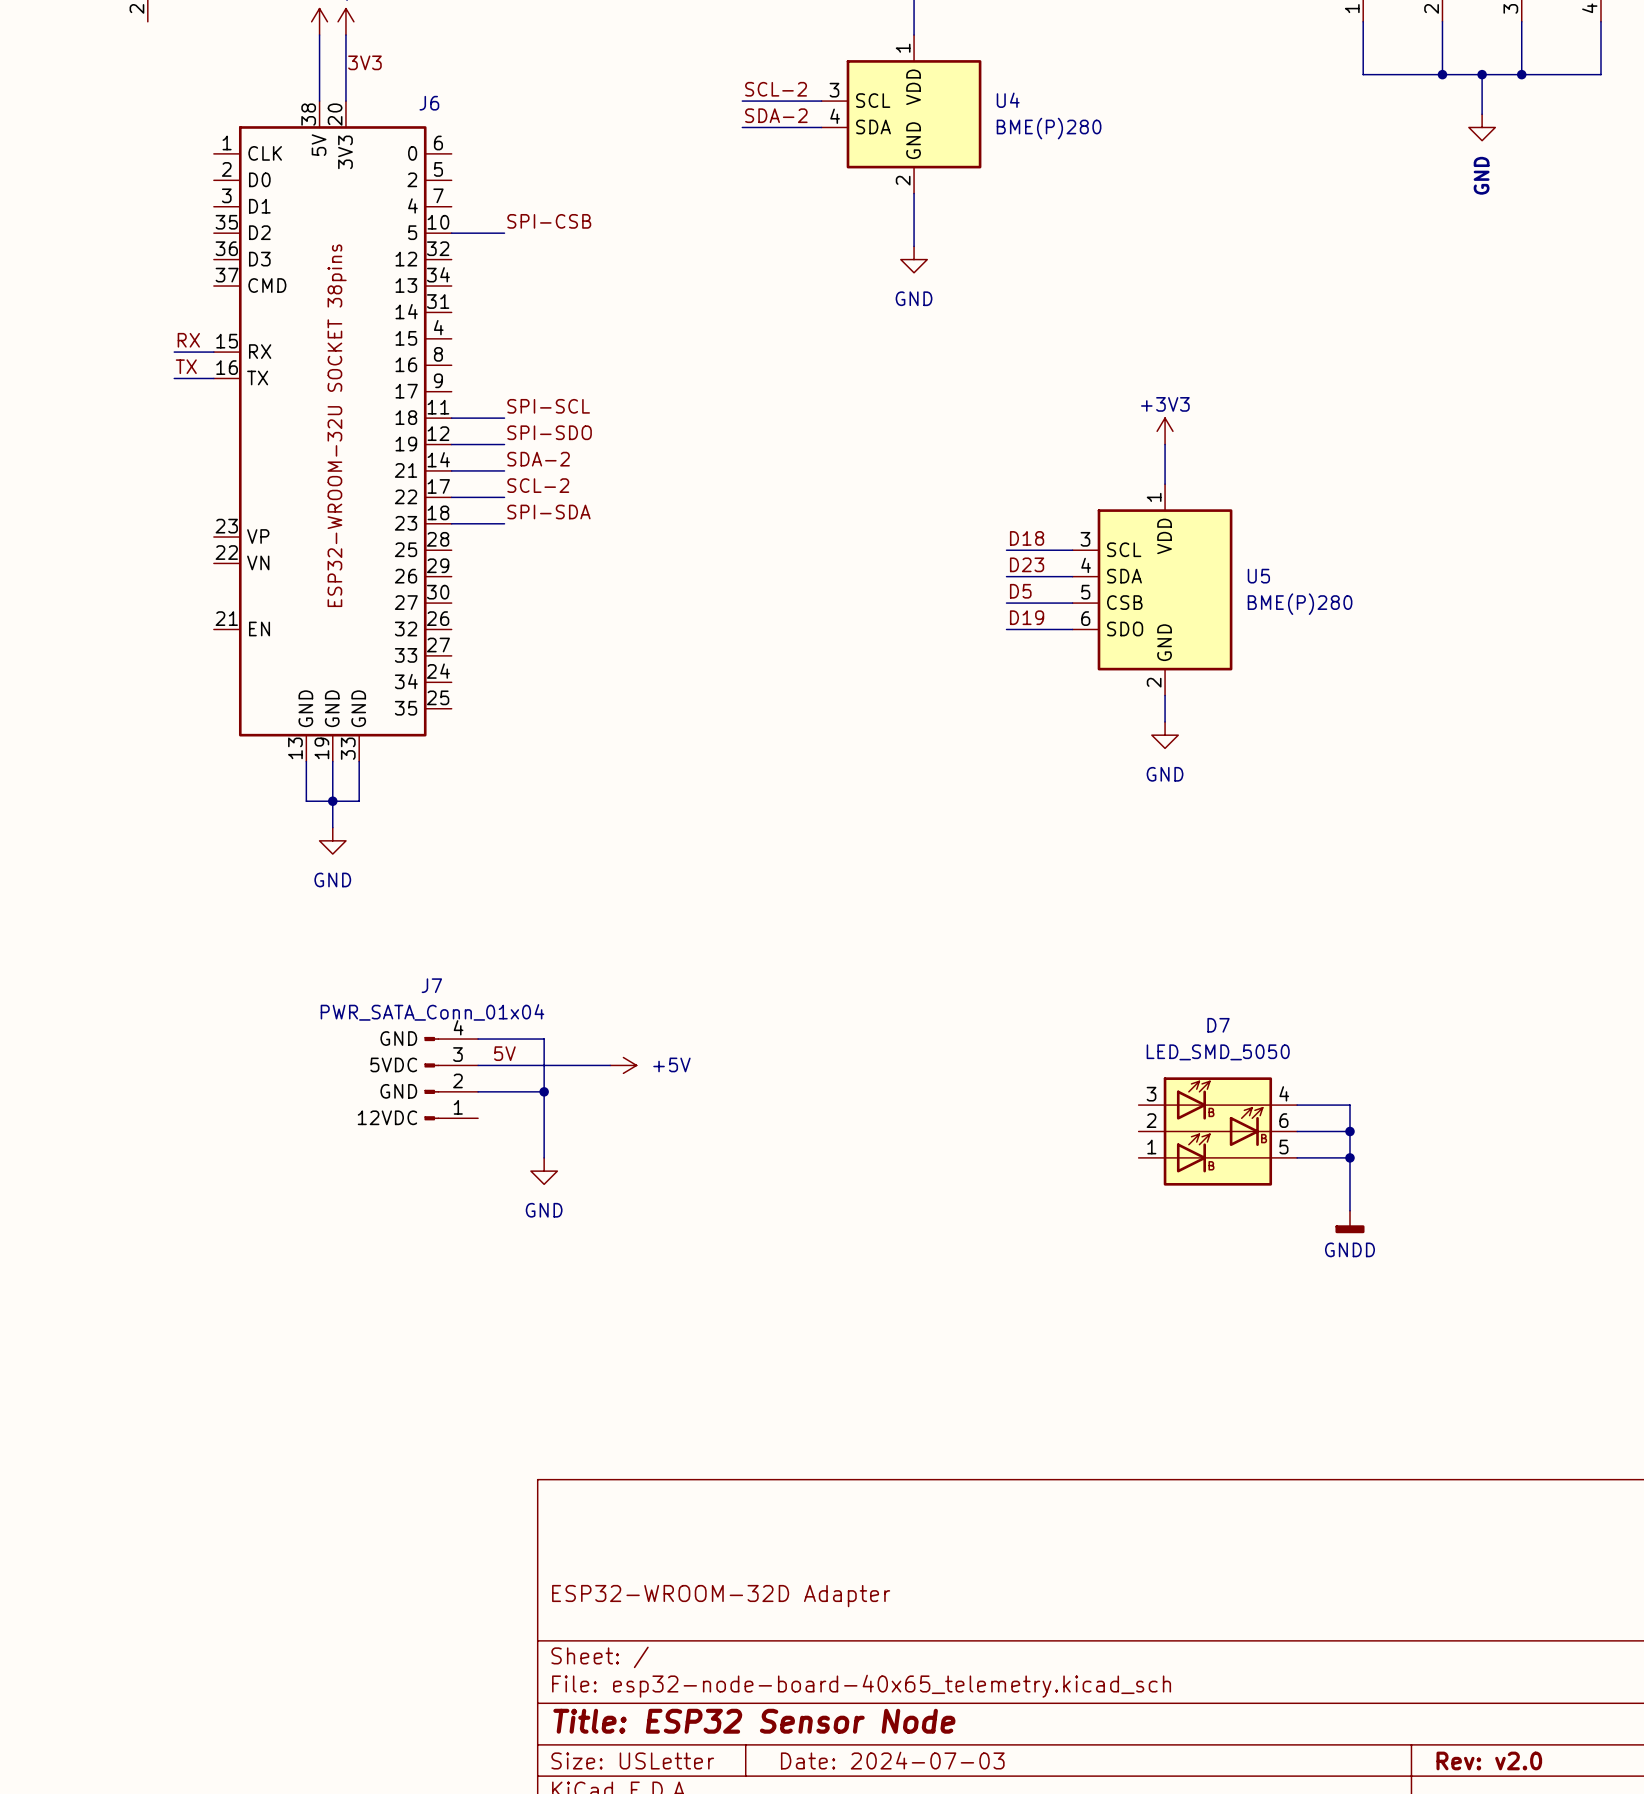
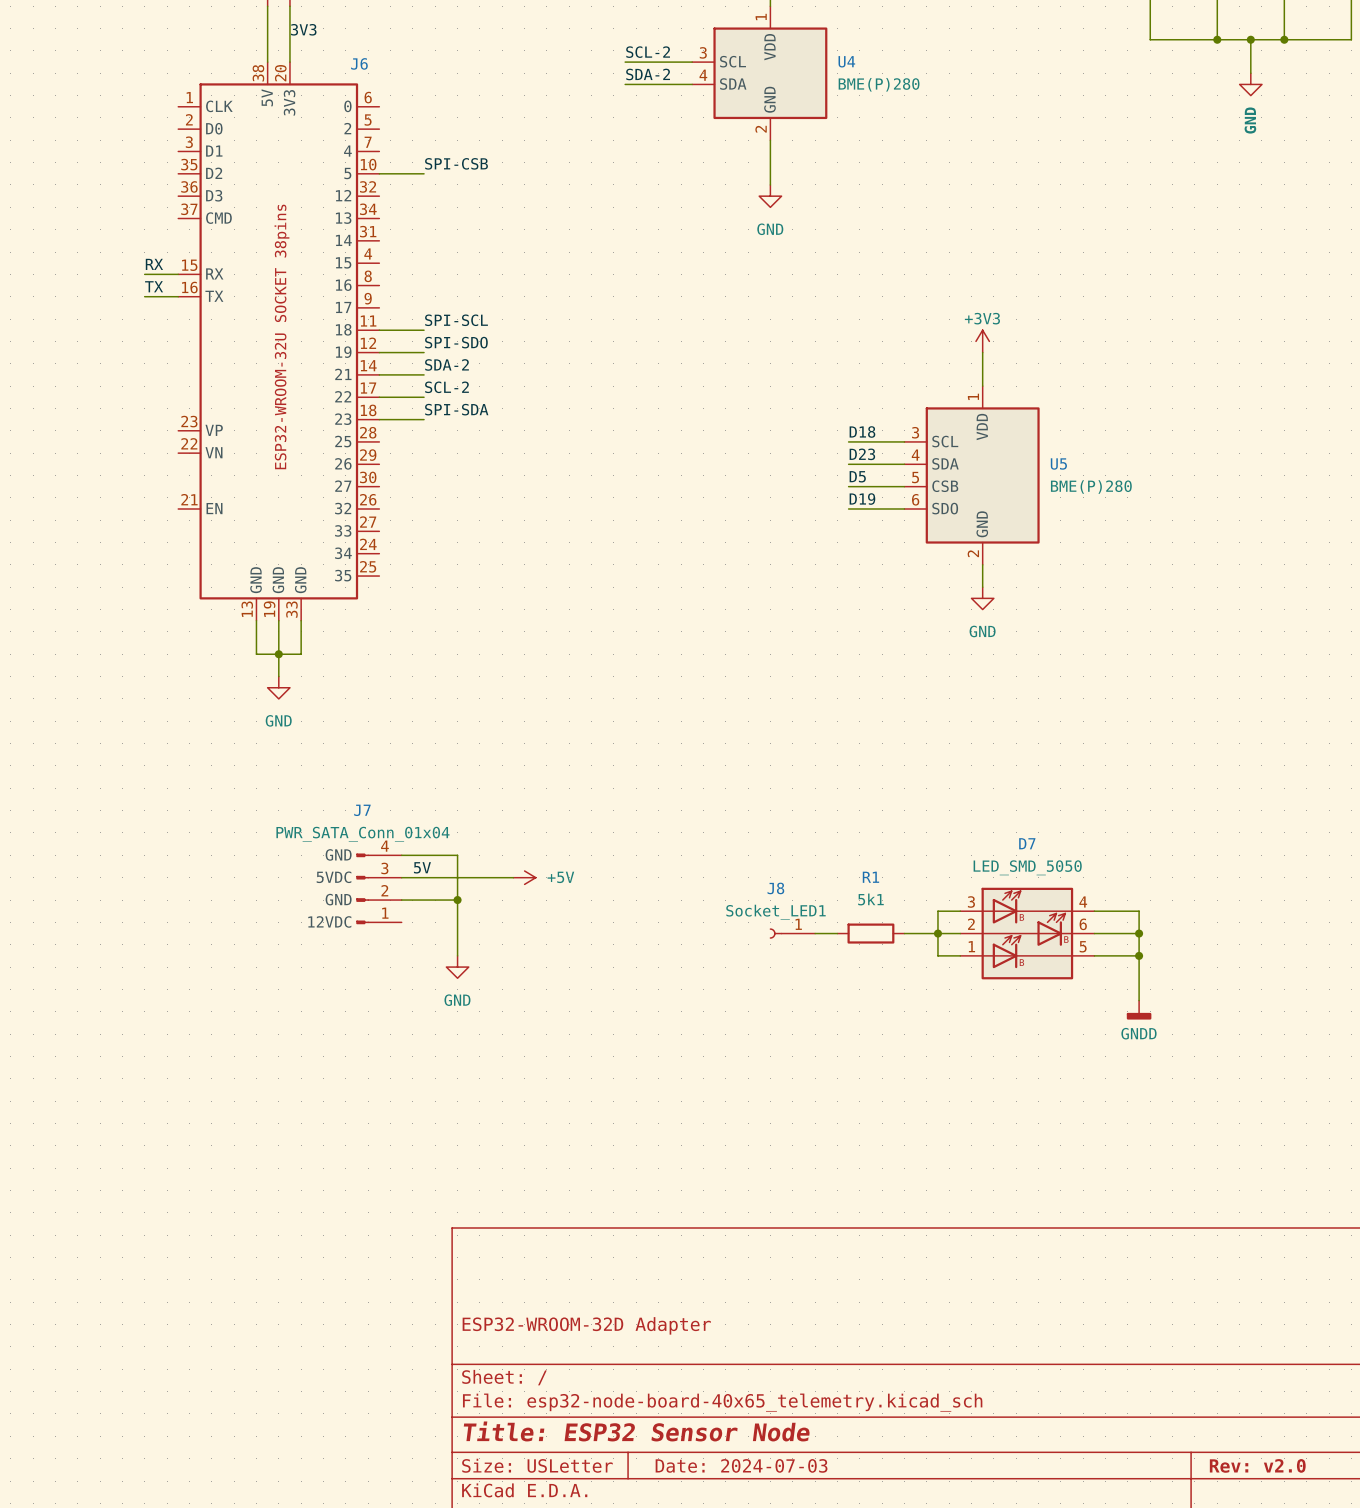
wire: none -> (960, 911) (937, 911) (937, 955) (960, 955)
J8: none -> Socket_LED1 (792, 933)
wire: none -> (815, 933) (837, 933)
R1: none -> 5k1 (870, 933)
wire: none -> (904, 933) (960, 933)
junction: none -> (937, 933)

